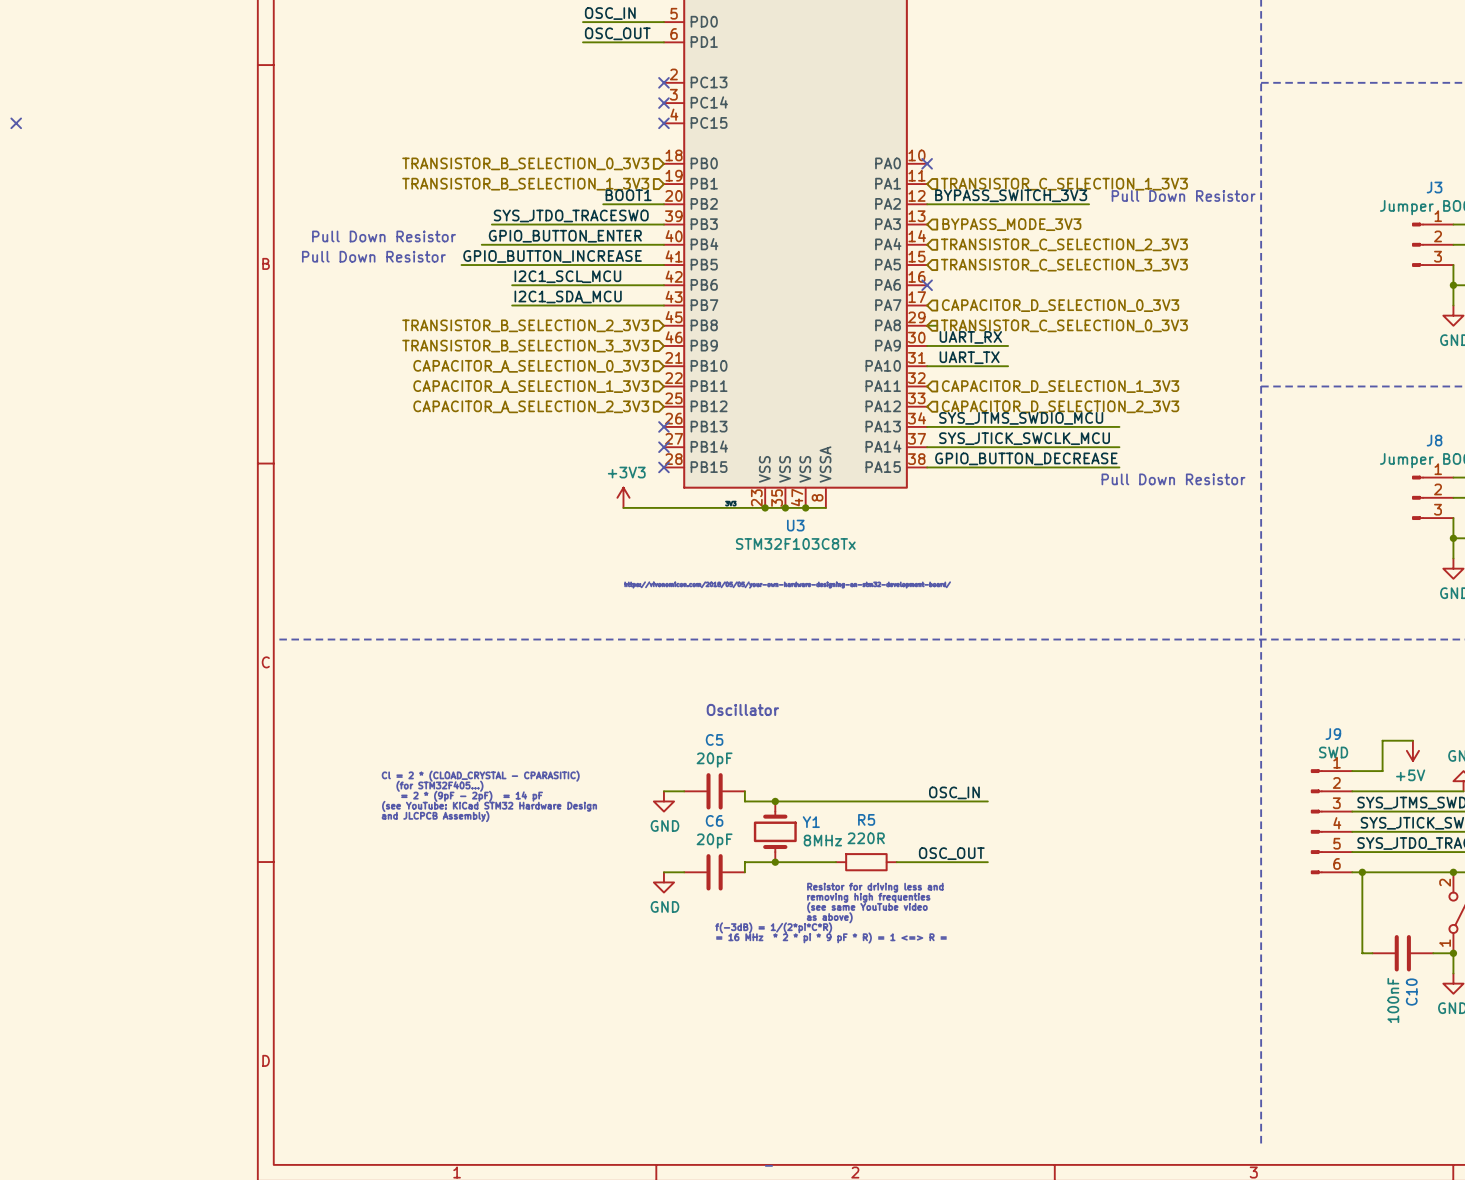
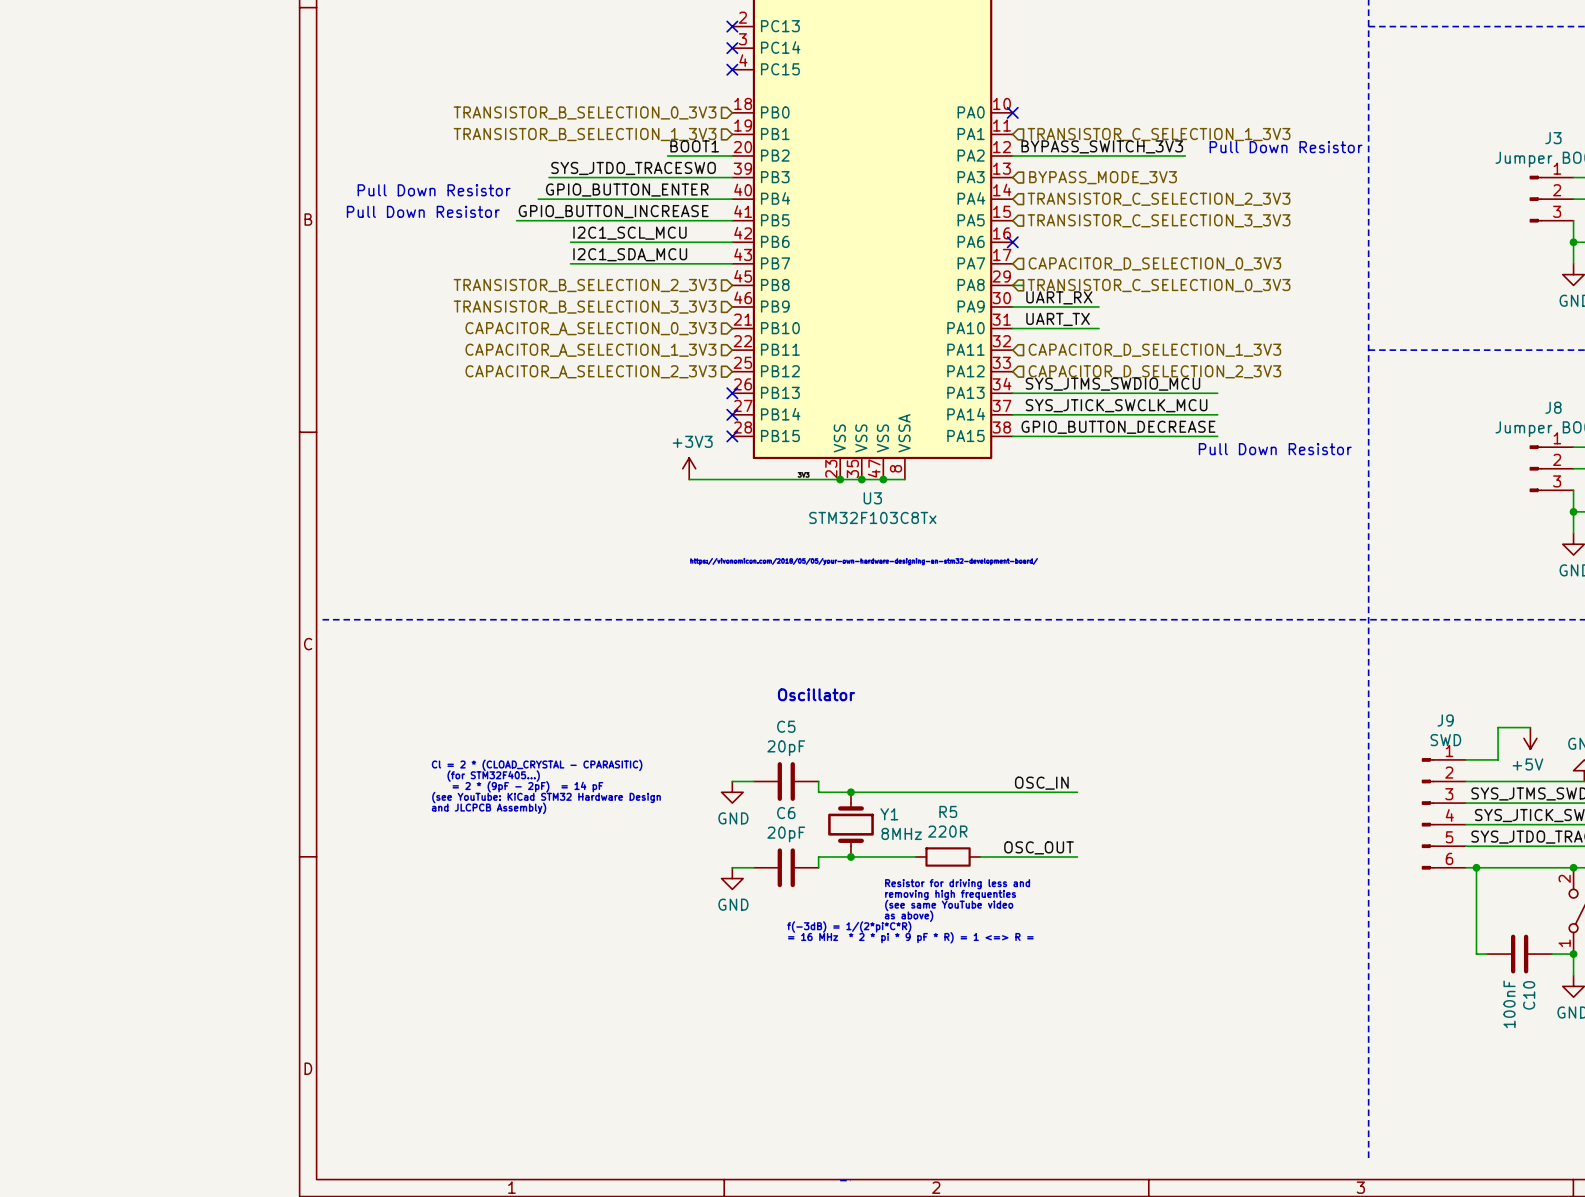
no-connect mark: (16, 123) -> none

